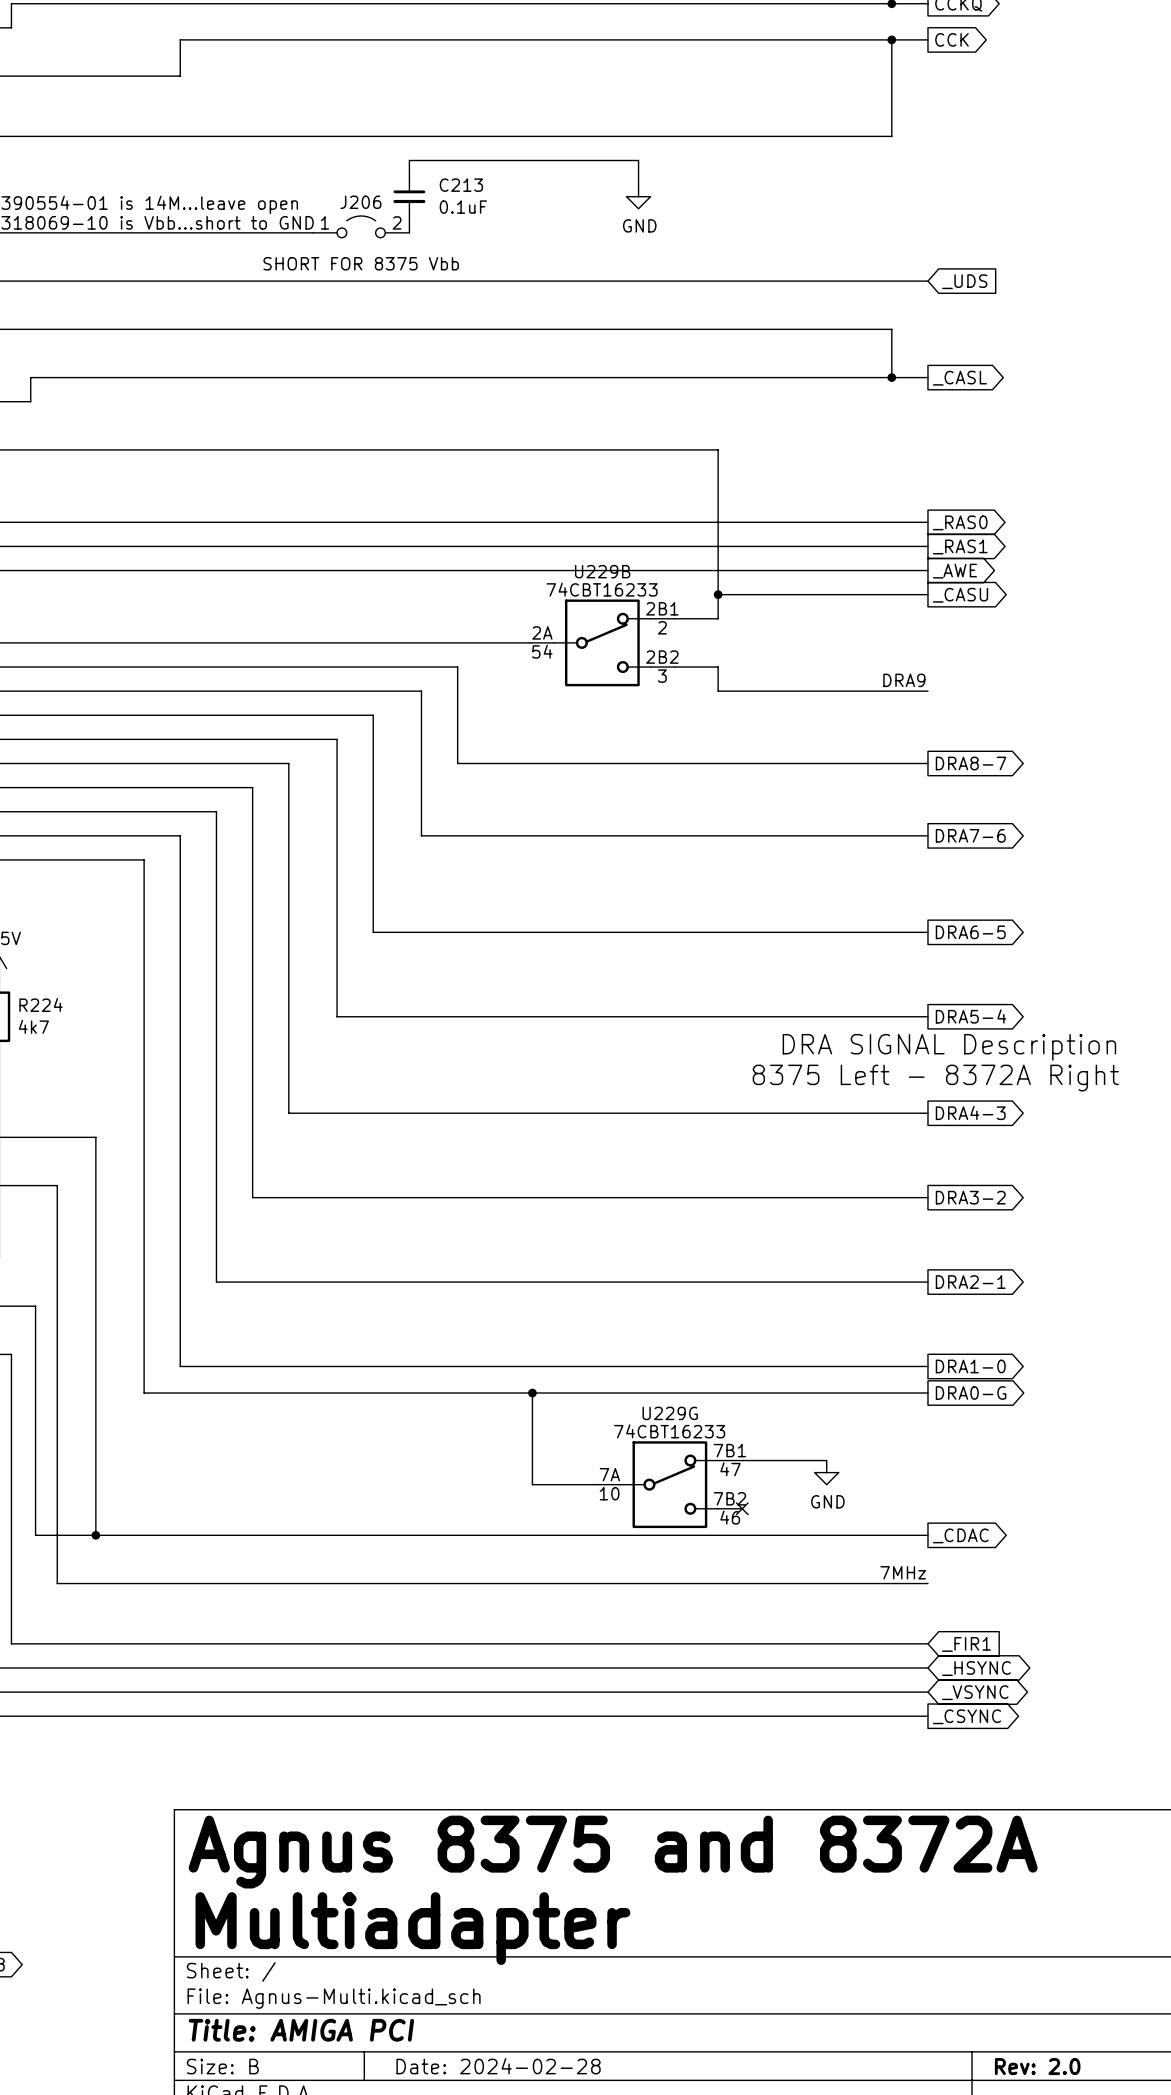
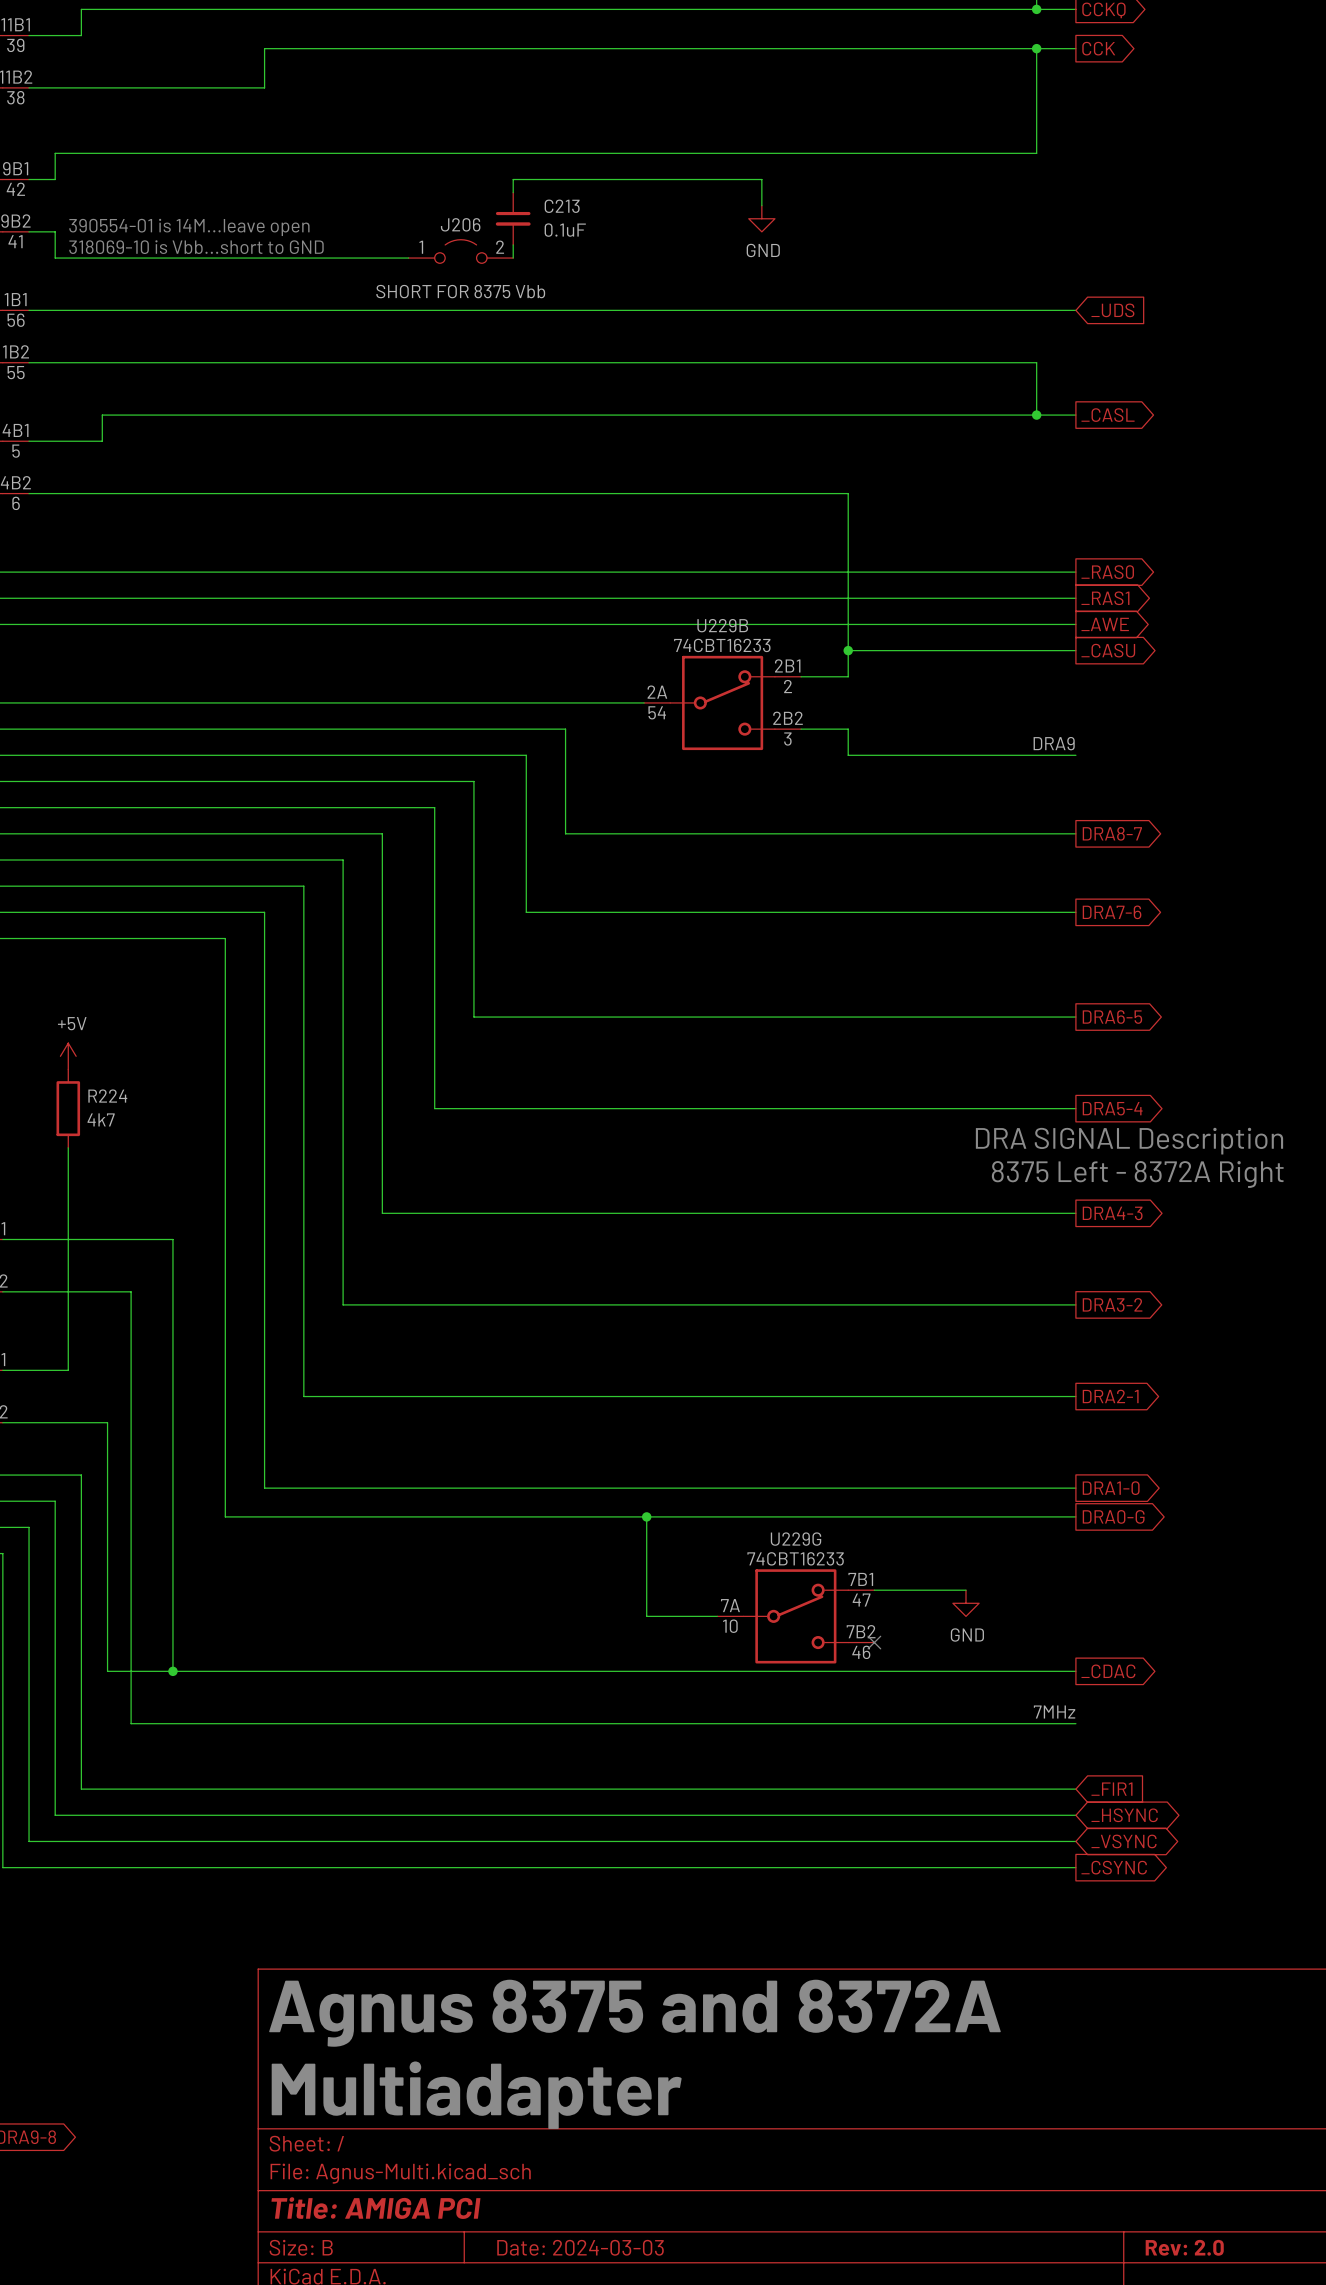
title block: Date: 2024-02-28 (498, 2066) -> Date: 2024-03-03 (580, 2247)

